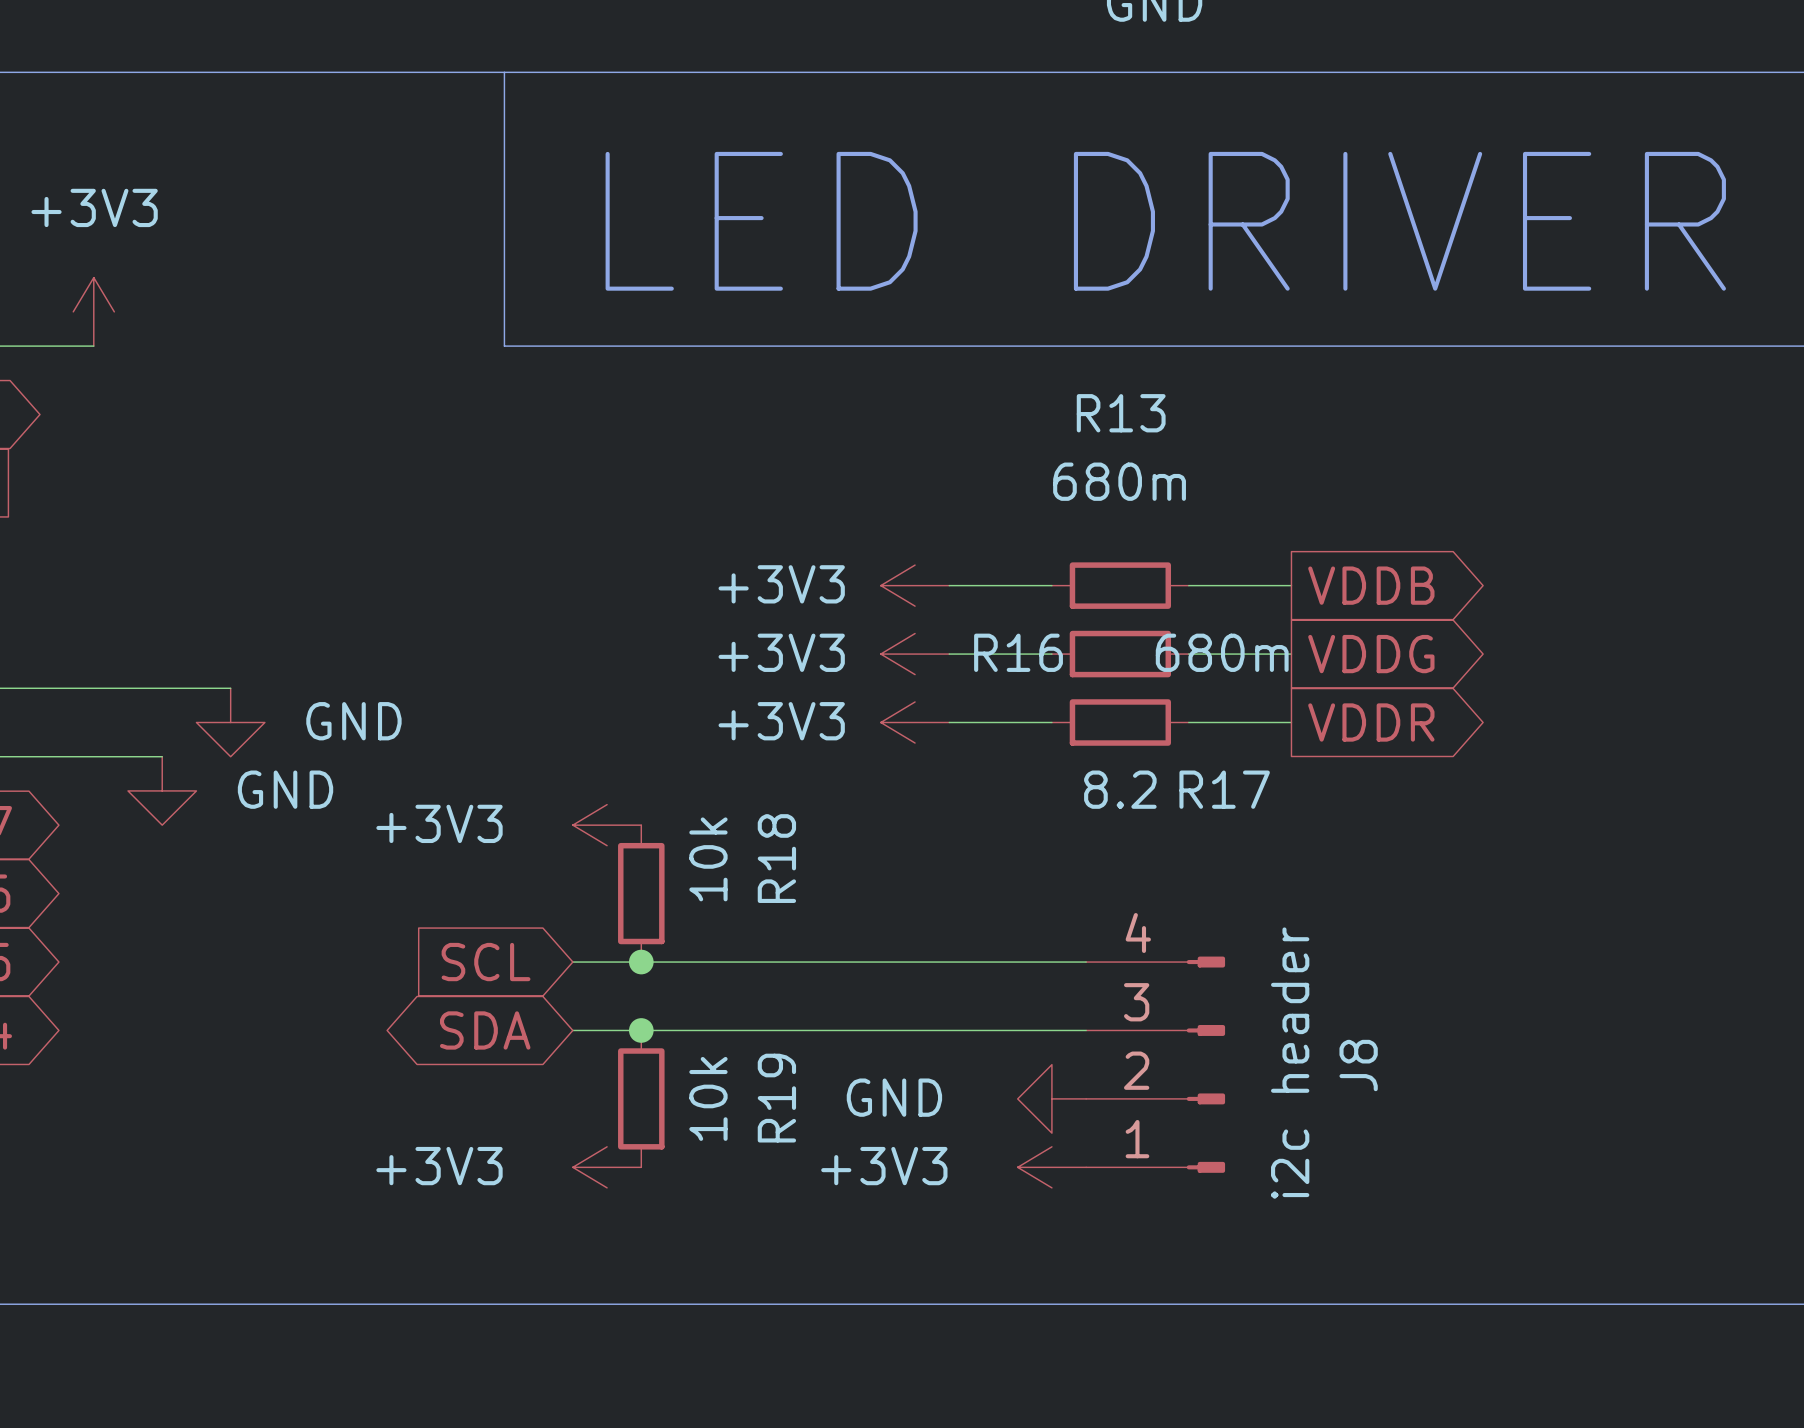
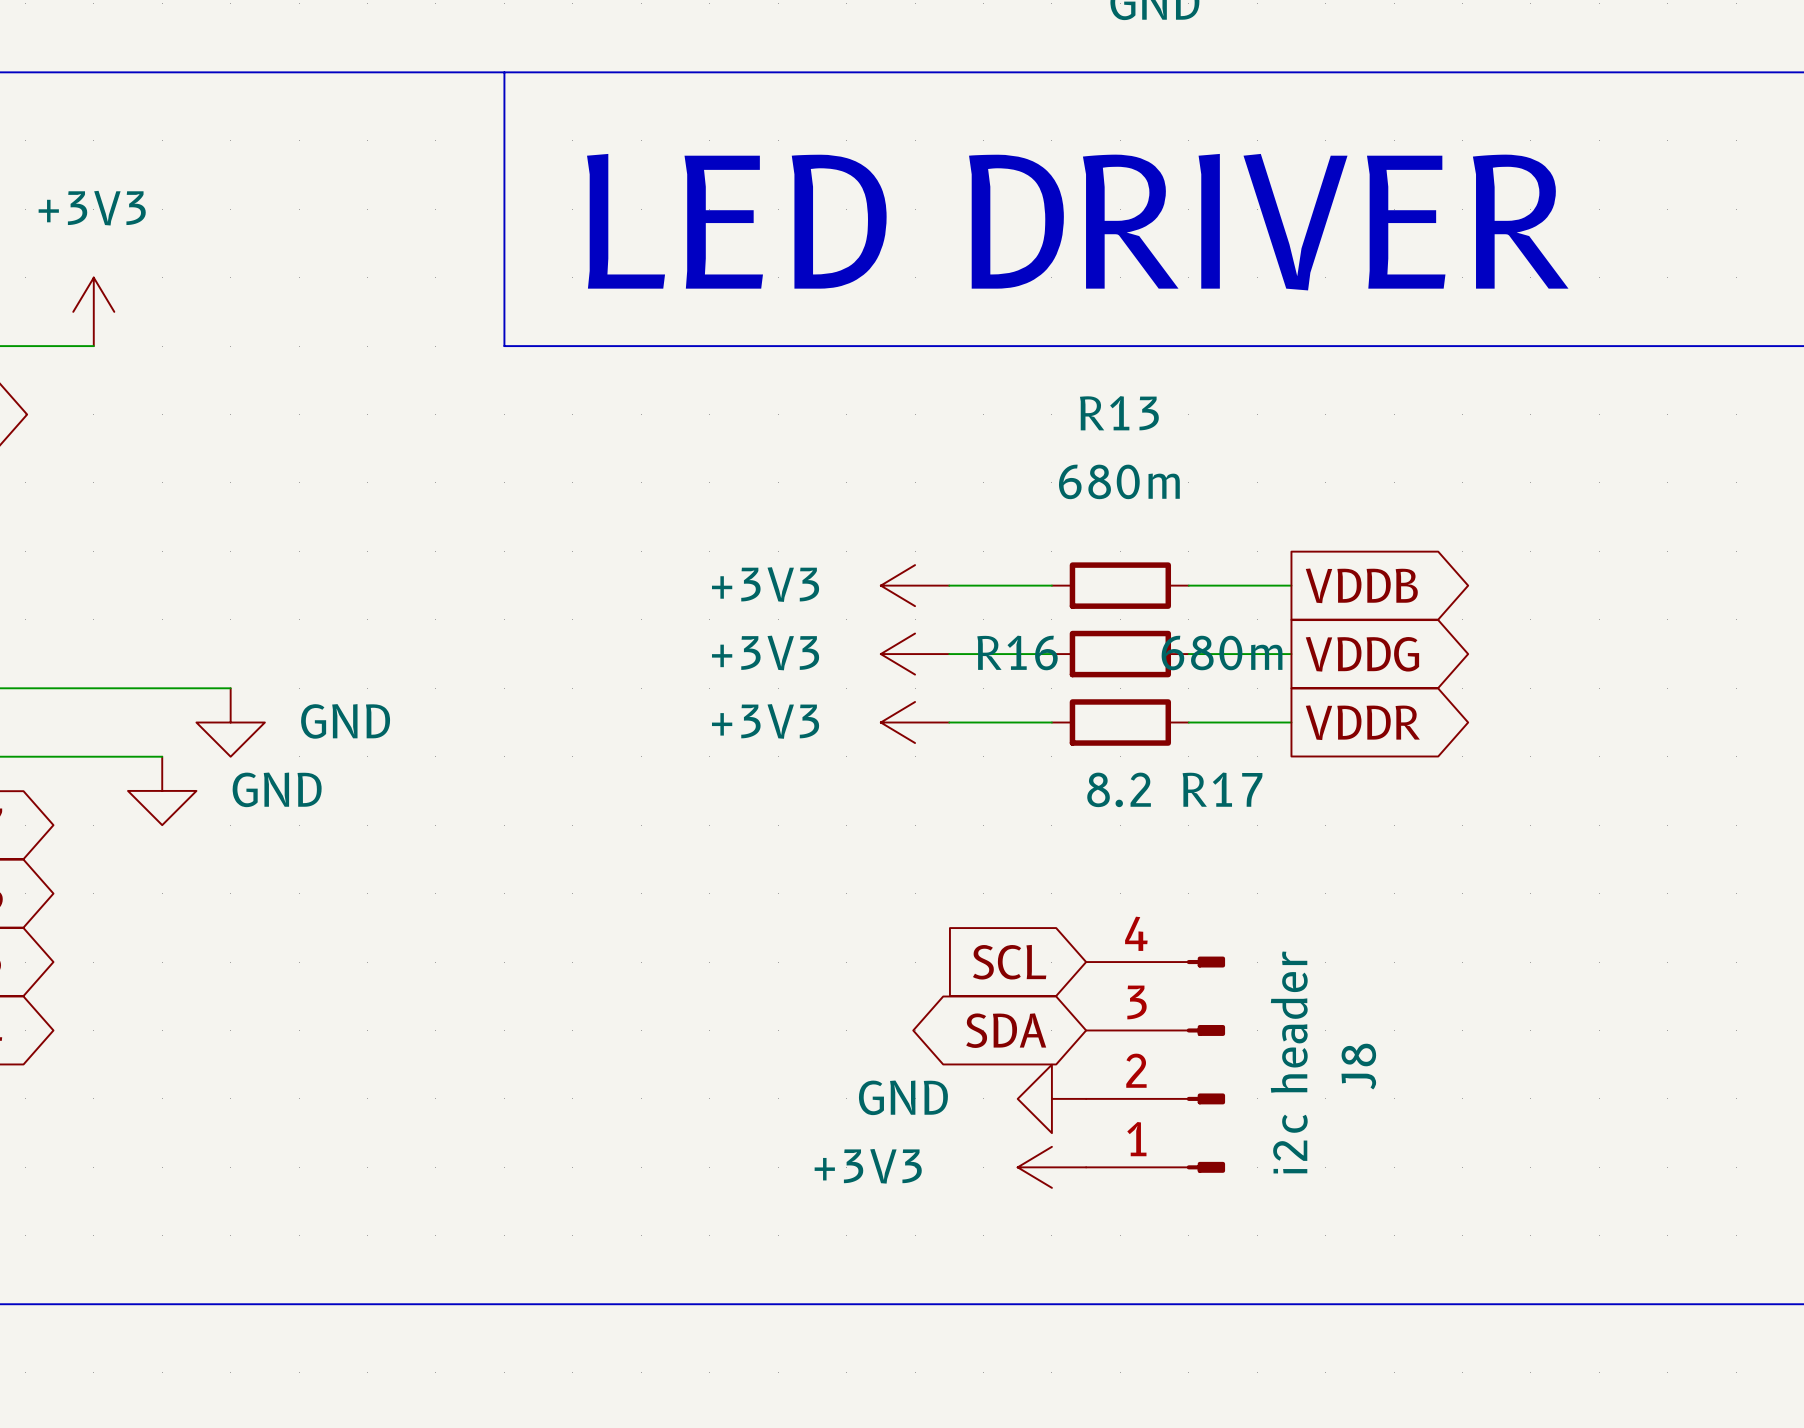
power symbol: +3V3 (607, 825) -> none
R18: 10k (641, 893) -> none
global label position: SCL (486, 962) -> SCL (1009, 962)
wire: (572, 962) (1086, 962) -> none
junction: (641, 962) -> none
global label position: SDA (485, 1030) -> SDA (1006, 1030)
wire: (572, 1030) (1086, 1030) -> none
junction: (641, 1030) -> none
R19: 10k (641, 1098) -> none
power symbol: +3V3 (607, 1167) -> none

